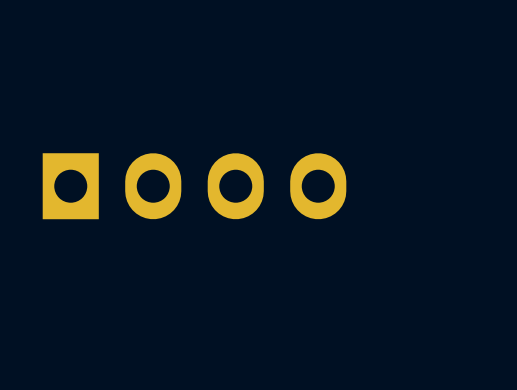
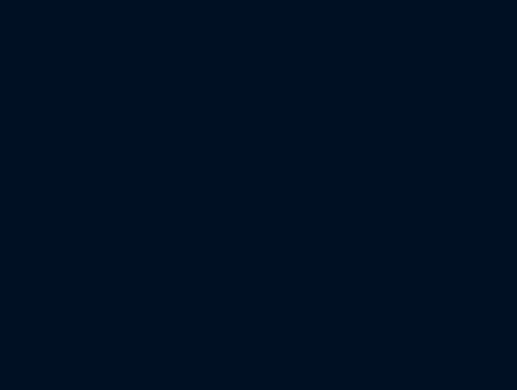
part: (194, 186) -> none

